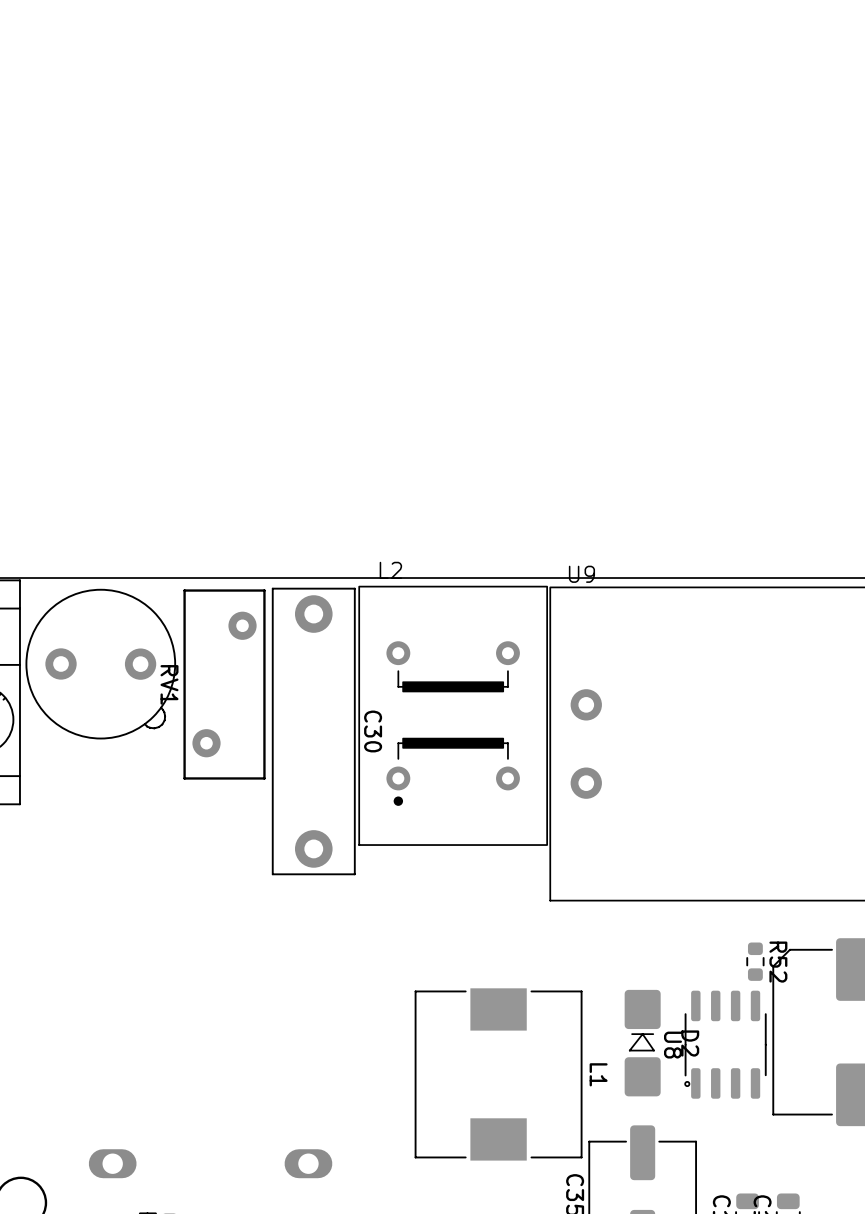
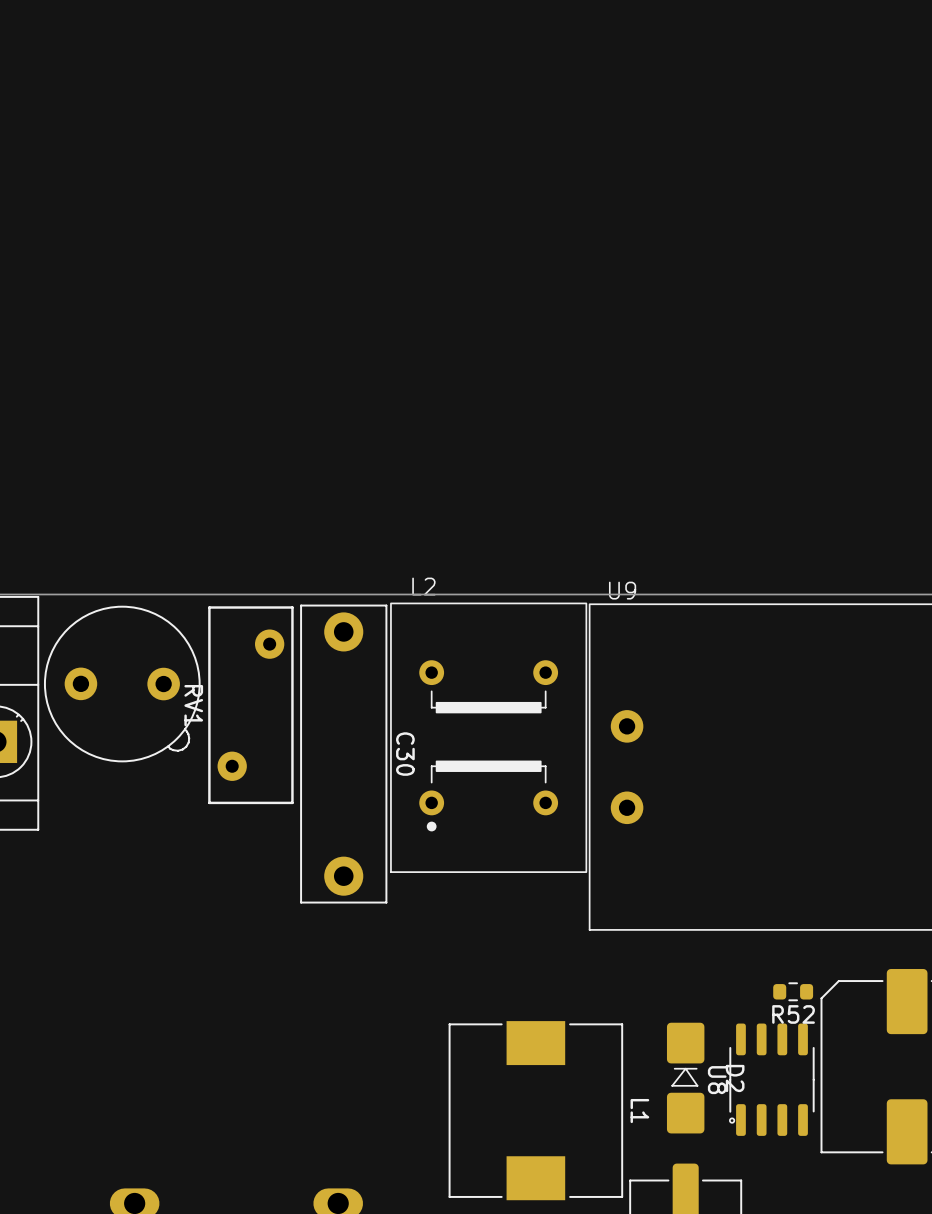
R52 rotation: 0° (755, 961) -> 90° clockwise (793, 991)

